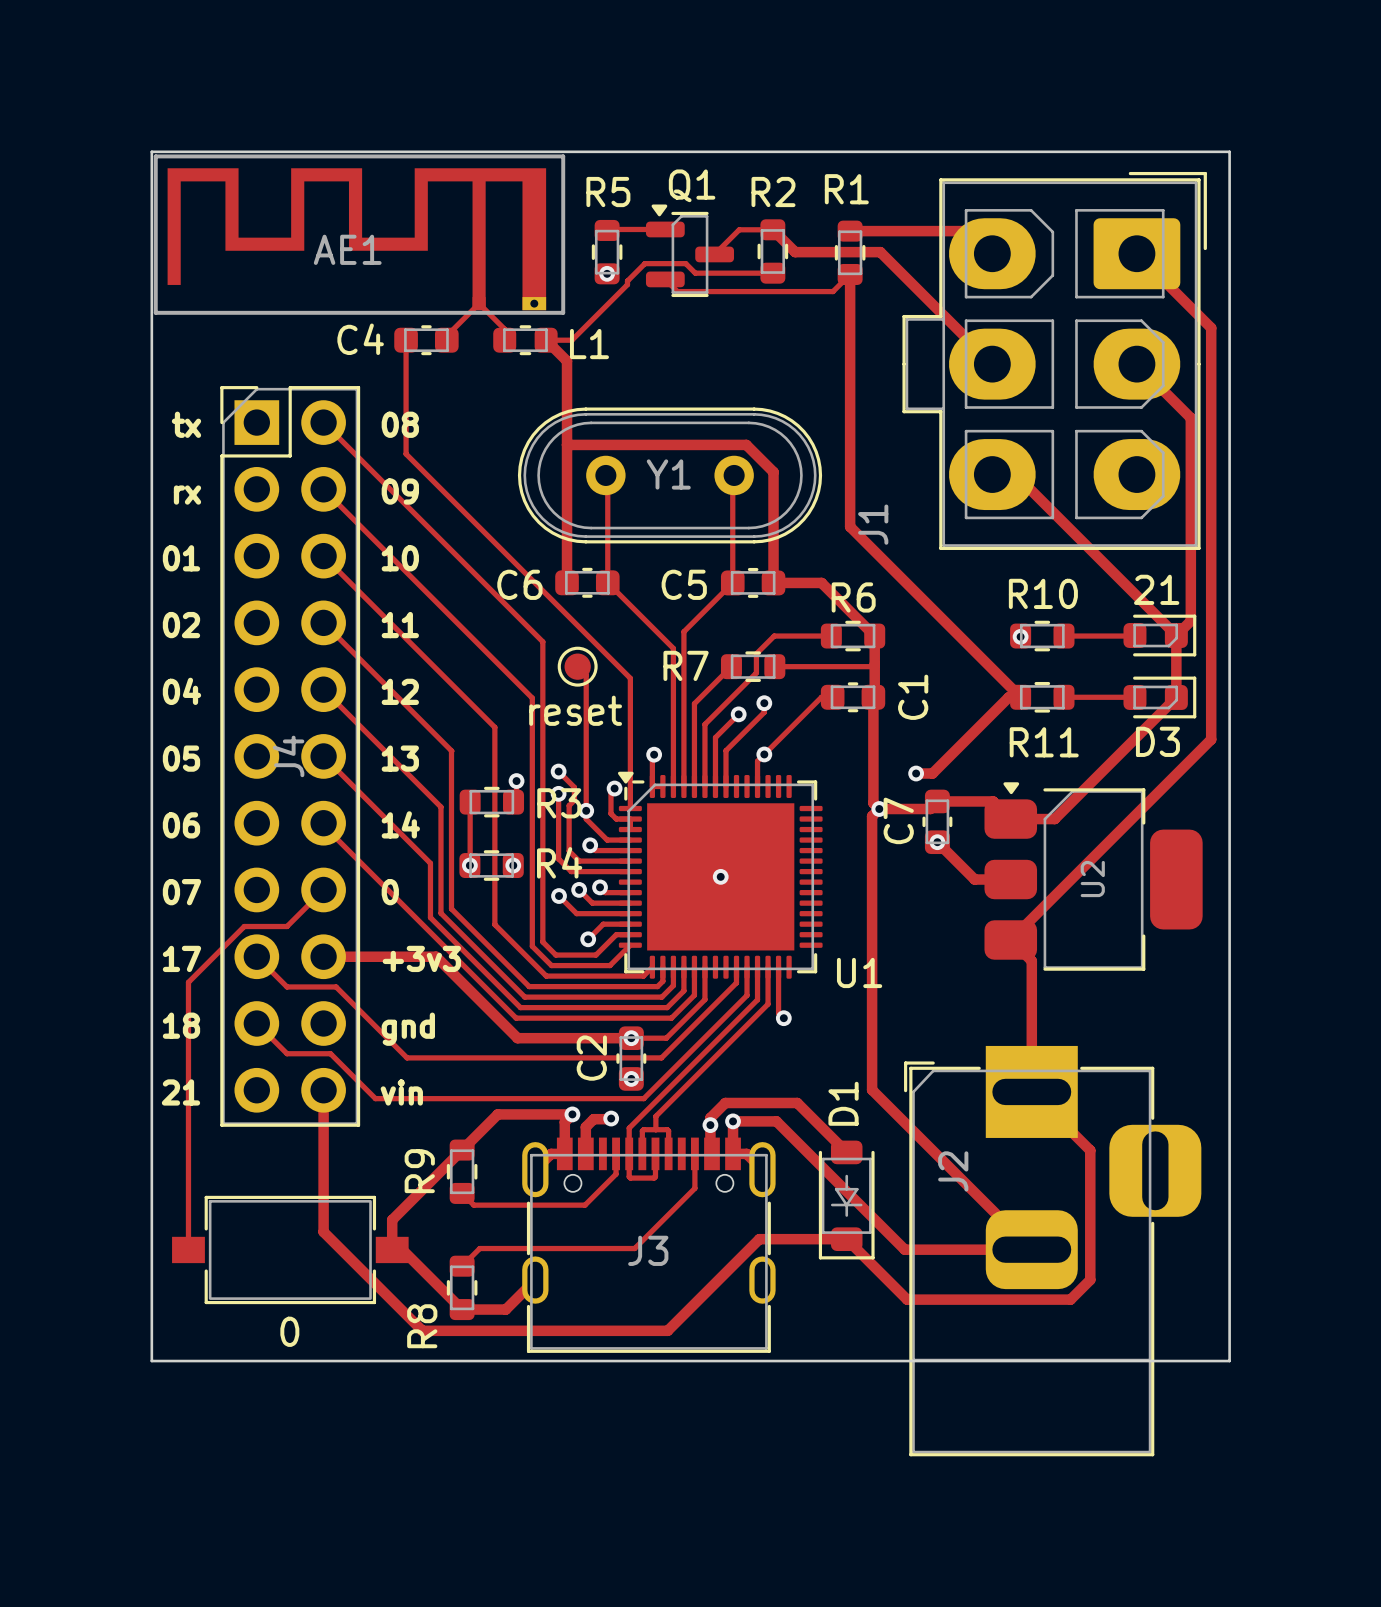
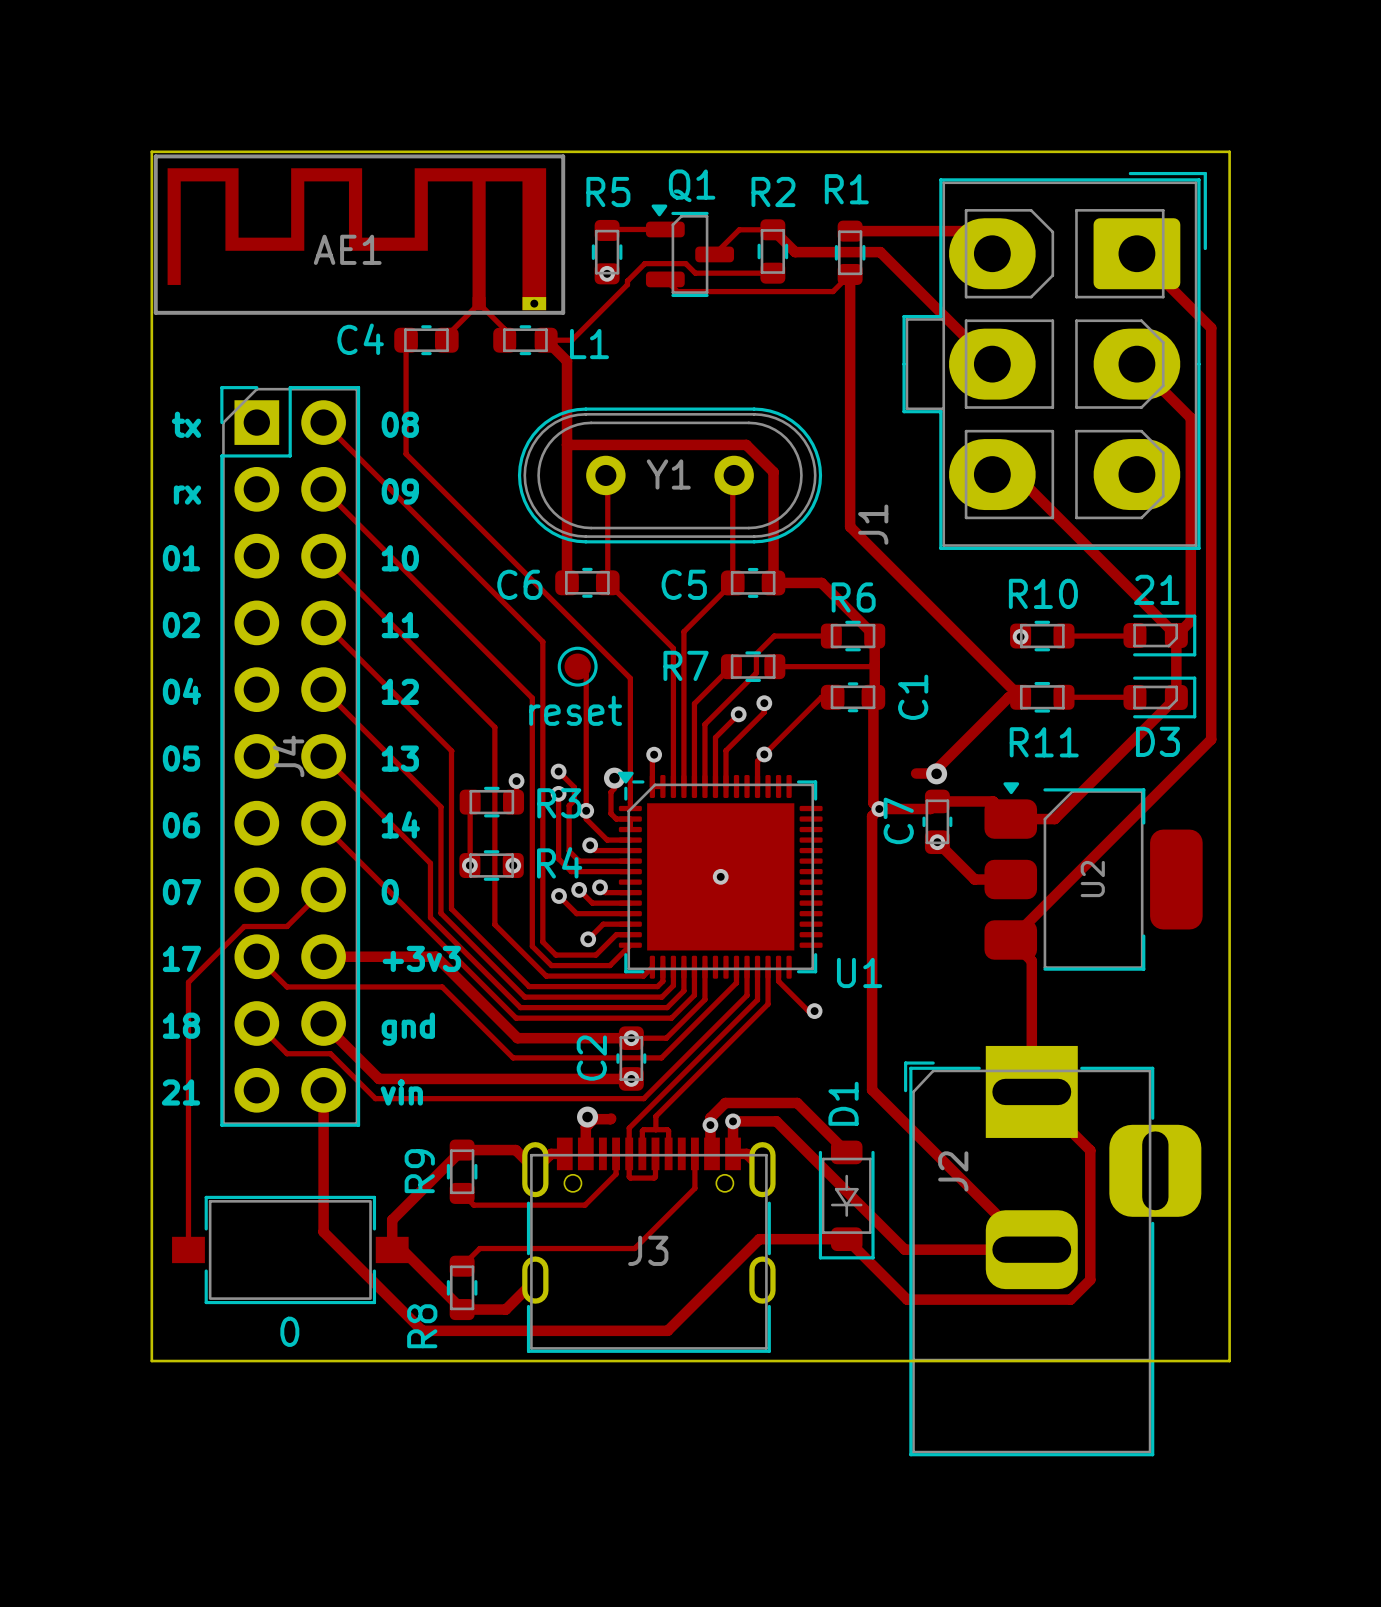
via: (916, 773) -> none
via: none -> (936, 773)
via size: [606, 780, 623, 797] -> [603, 767, 625, 789]
track: (778, 981) (778, 1012) (783, 1018) -> (778, 981) (808, 1011) (814, 1011)
track: (336, 986) (407, 1057) (513, 1057) -> (336, 986) (442, 986) (513, 1057)
via position: (783, 1018) -> (814, 1011)
track: none -> (323, 1023) (379, 1078) (631, 1078)
via position: (572, 1114) -> (587, 1117)
via: (611, 1118) -> none
track: (462, 1150) (497, 1114) (572, 1114) (564, 1122) (564, 1153) -> (462, 1150) (515, 1150) (535, 1169)

